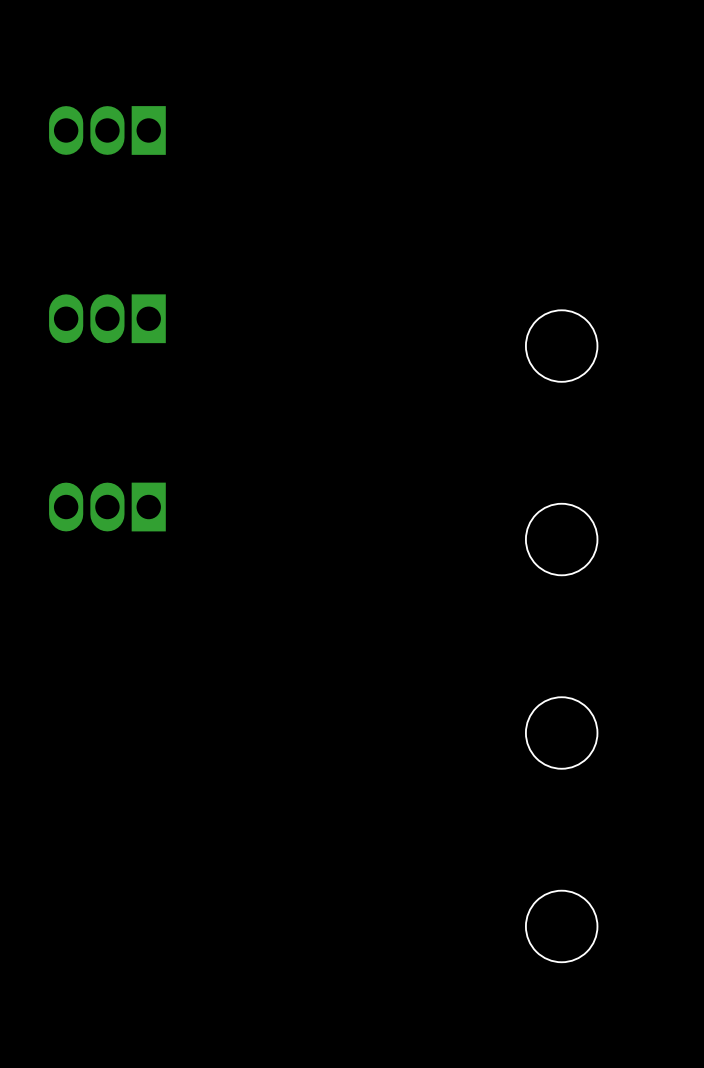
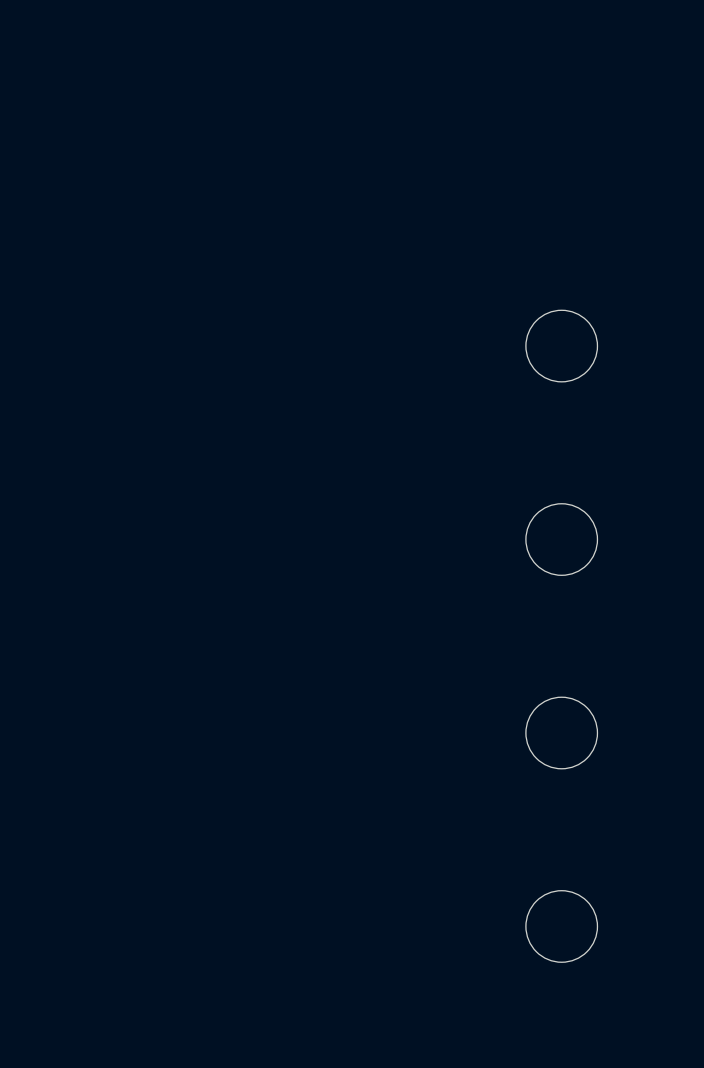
part: (107, 130) -> none
part: (107, 318) -> none
part: (107, 507) -> none

